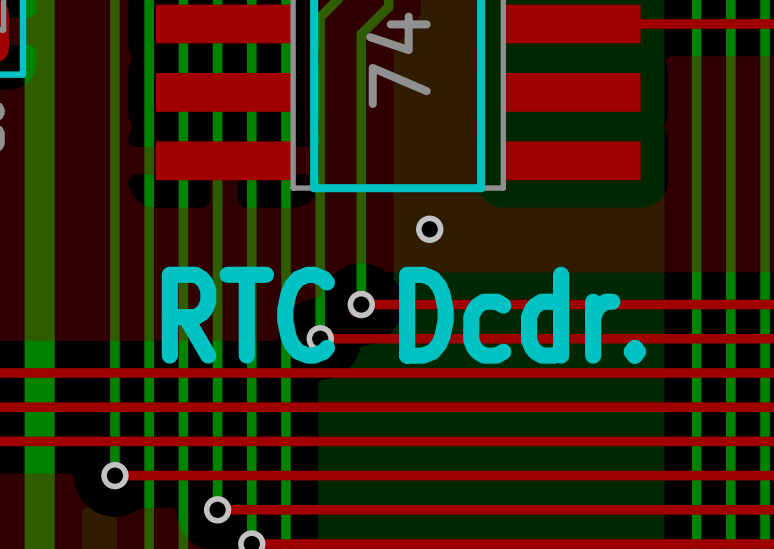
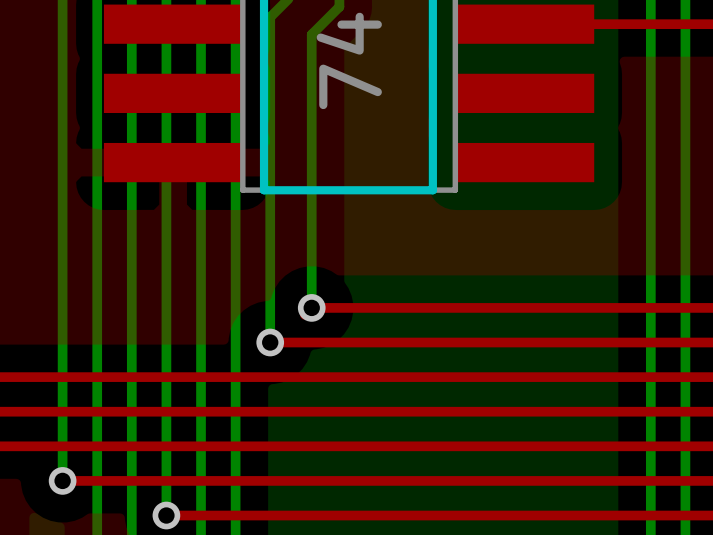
via: (429, 229) -> none
text: RTC Dcdr. (403, 315) -> none

